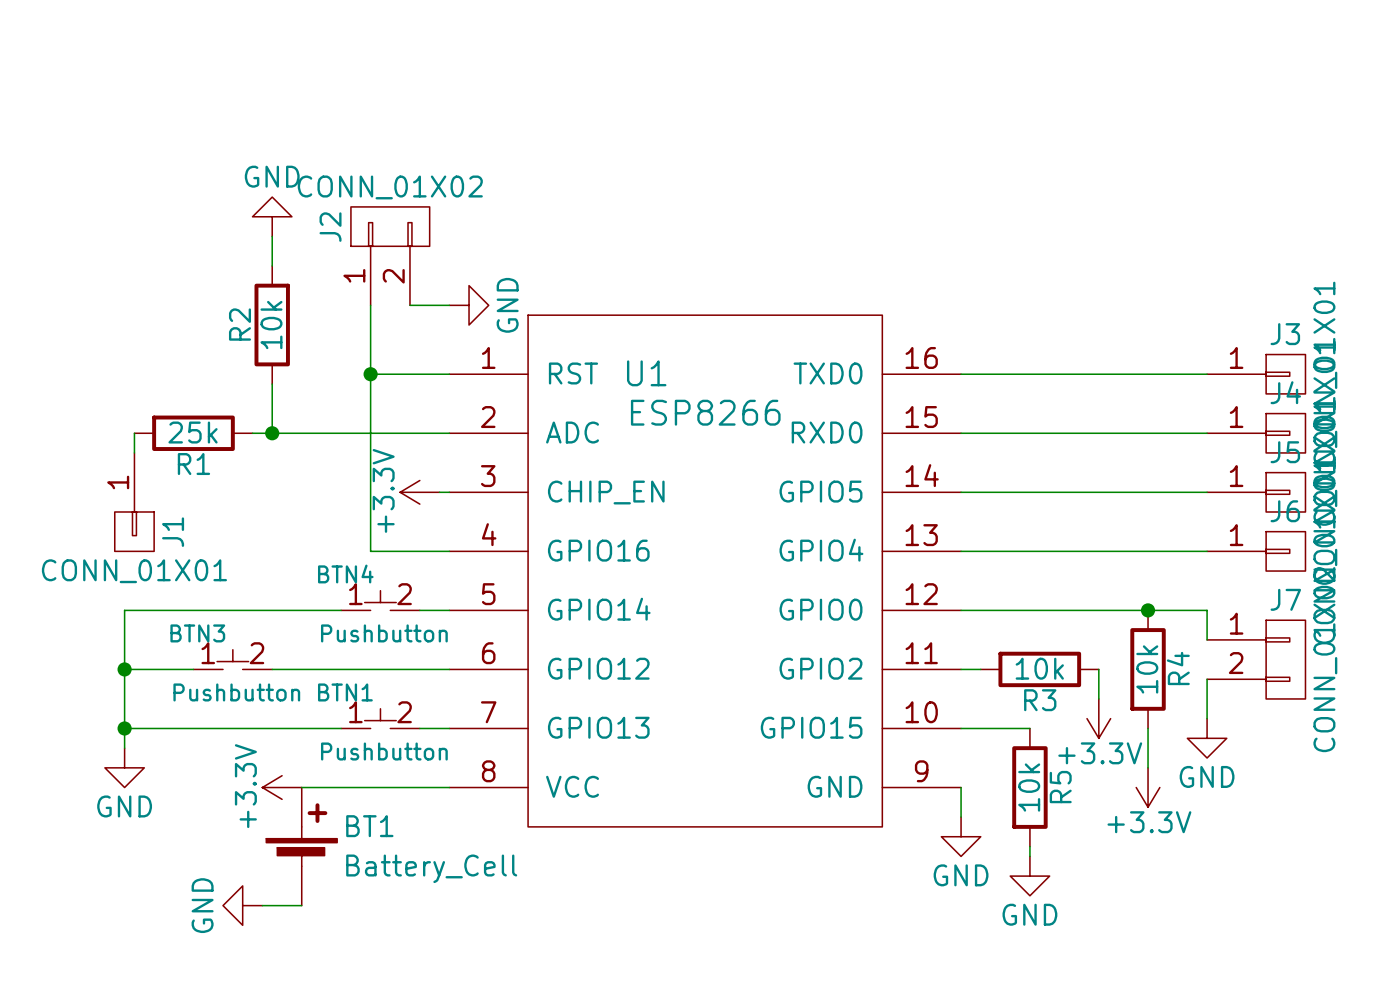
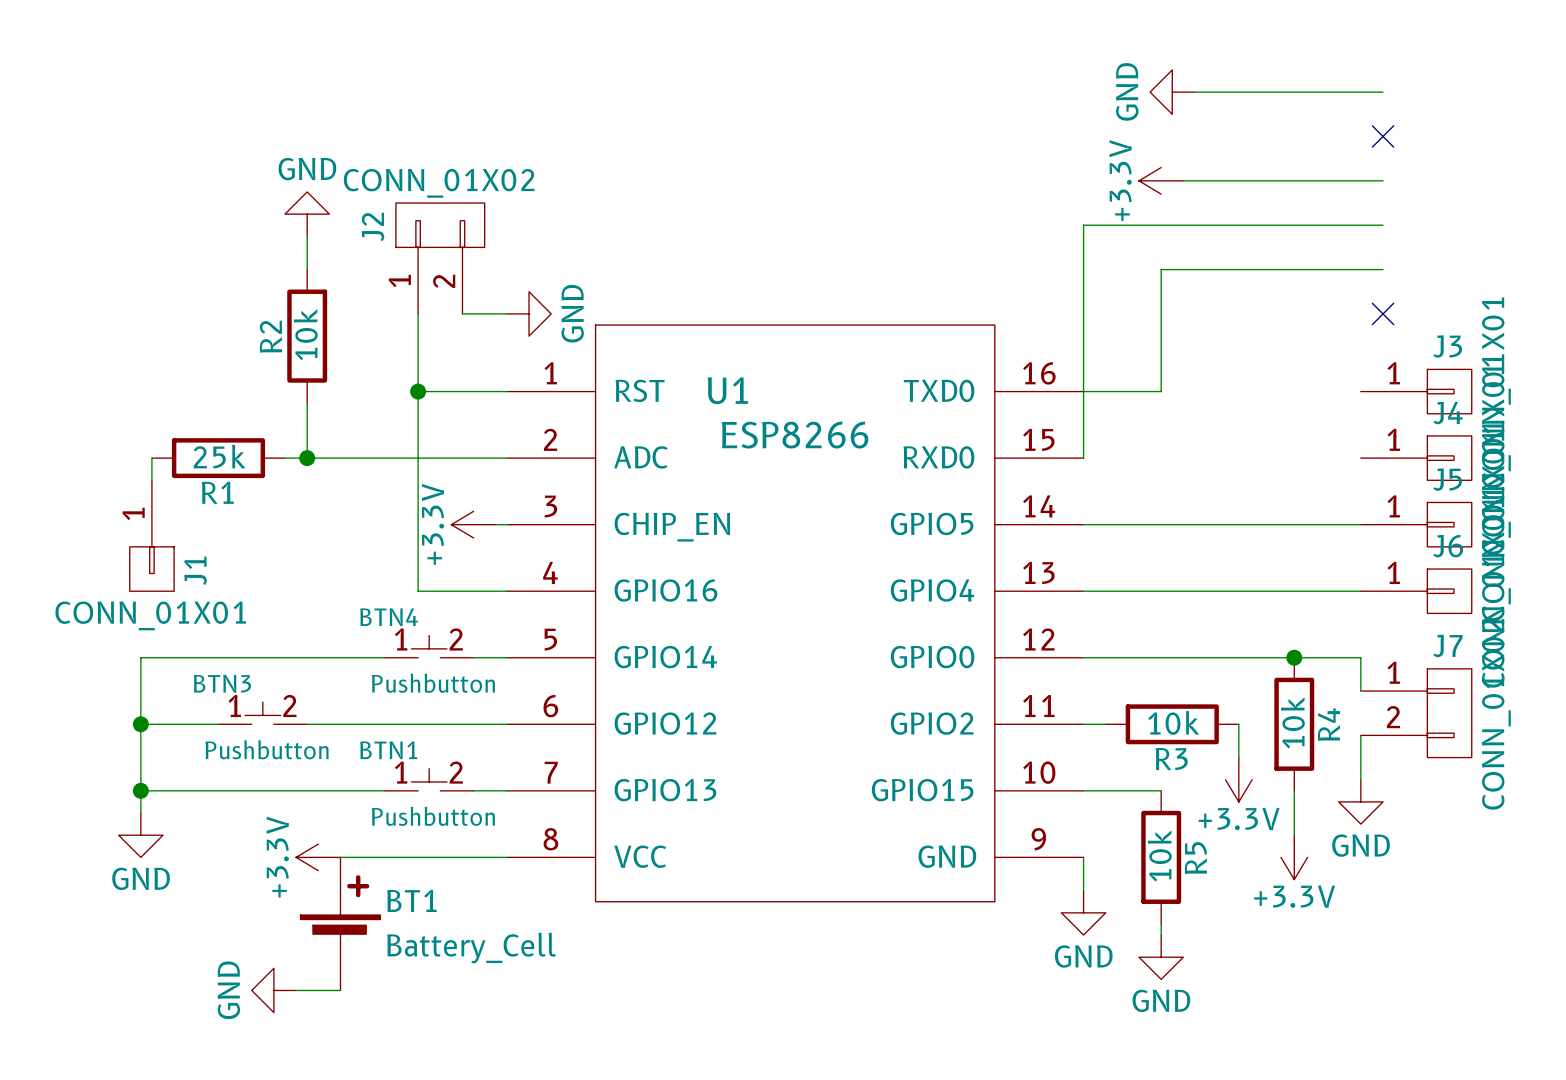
power symbol: none -> GND (1172, 92)
wire: none -> (1194, 92) (1383, 92)
no-connect mark: none -> (1383, 136)
power symbol: none -> +3.3V (1161, 180)
wire: none -> (1183, 180) (1383, 180)
no-connect mark: none -> (1383, 313)
wire: (1029, 374) (1207, 374) -> (1161, 391) (1161, 269) (1383, 269)
wire: (961, 433) (1207, 433) -> (1083, 458) (1083, 225) (1383, 225)

